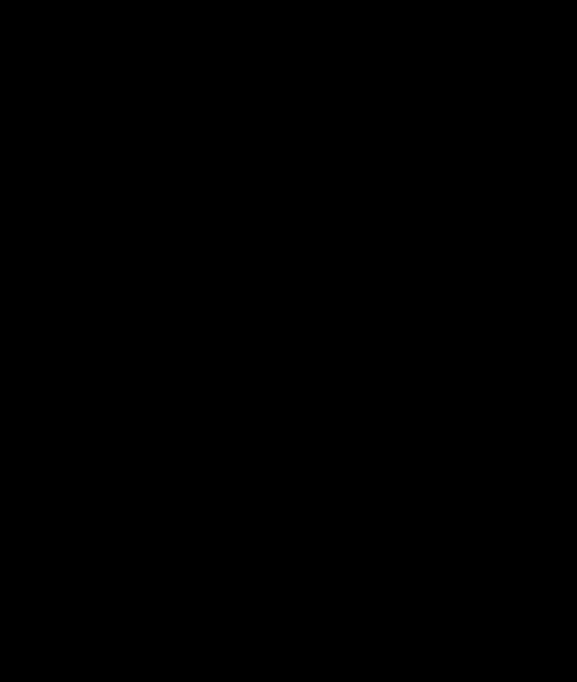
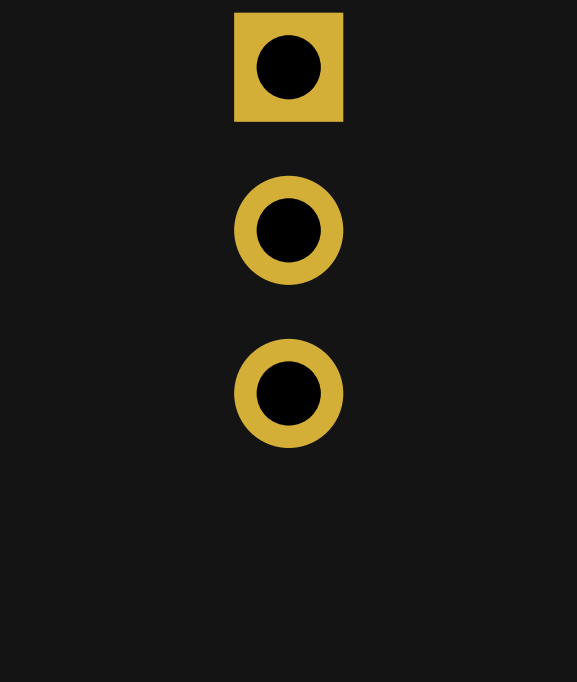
part: none -> (288, 230)

